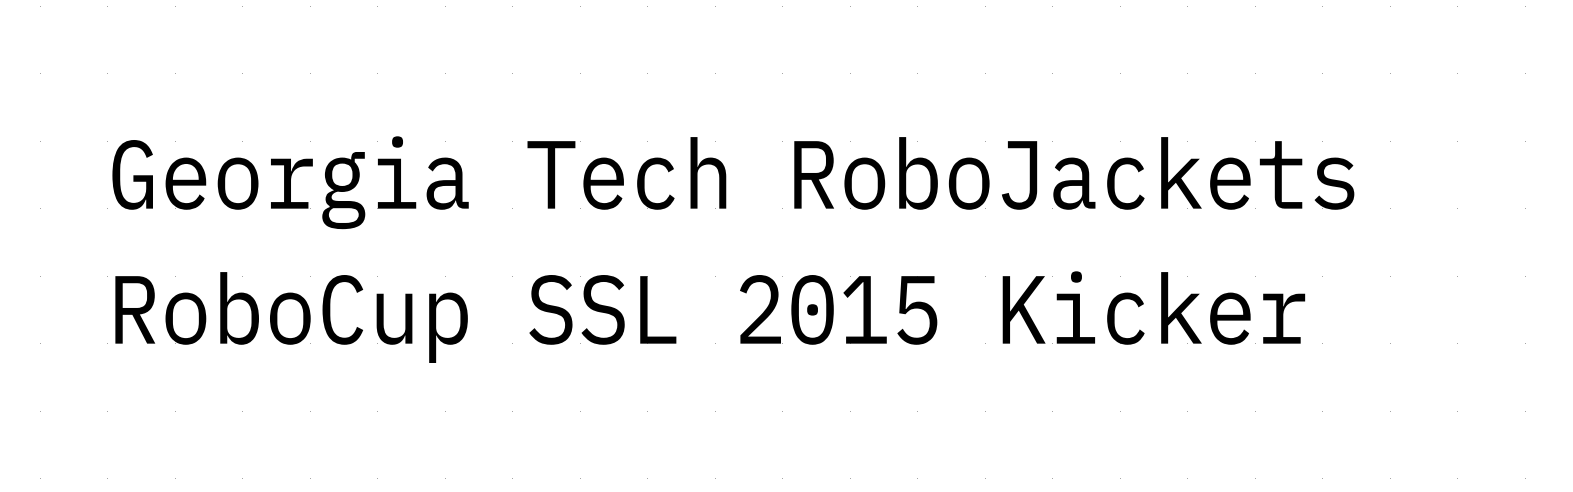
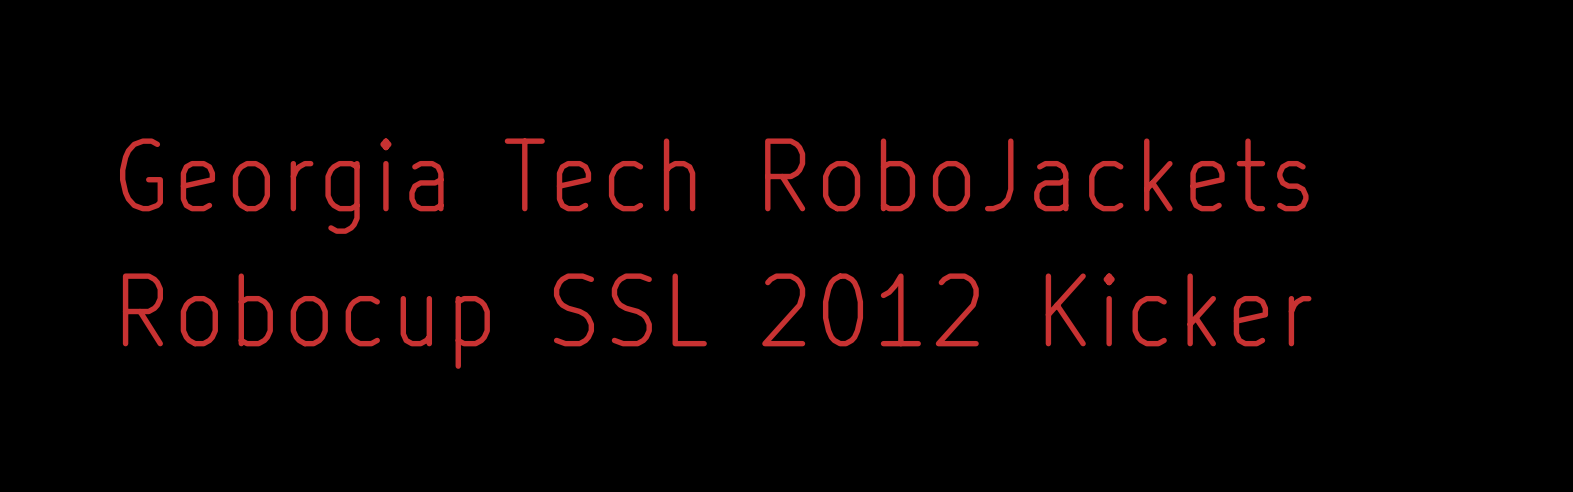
text: RoboCup SSL 2015 Kicker (710, 317) -> Robocup SSL 2012 Kicker (717, 321)

